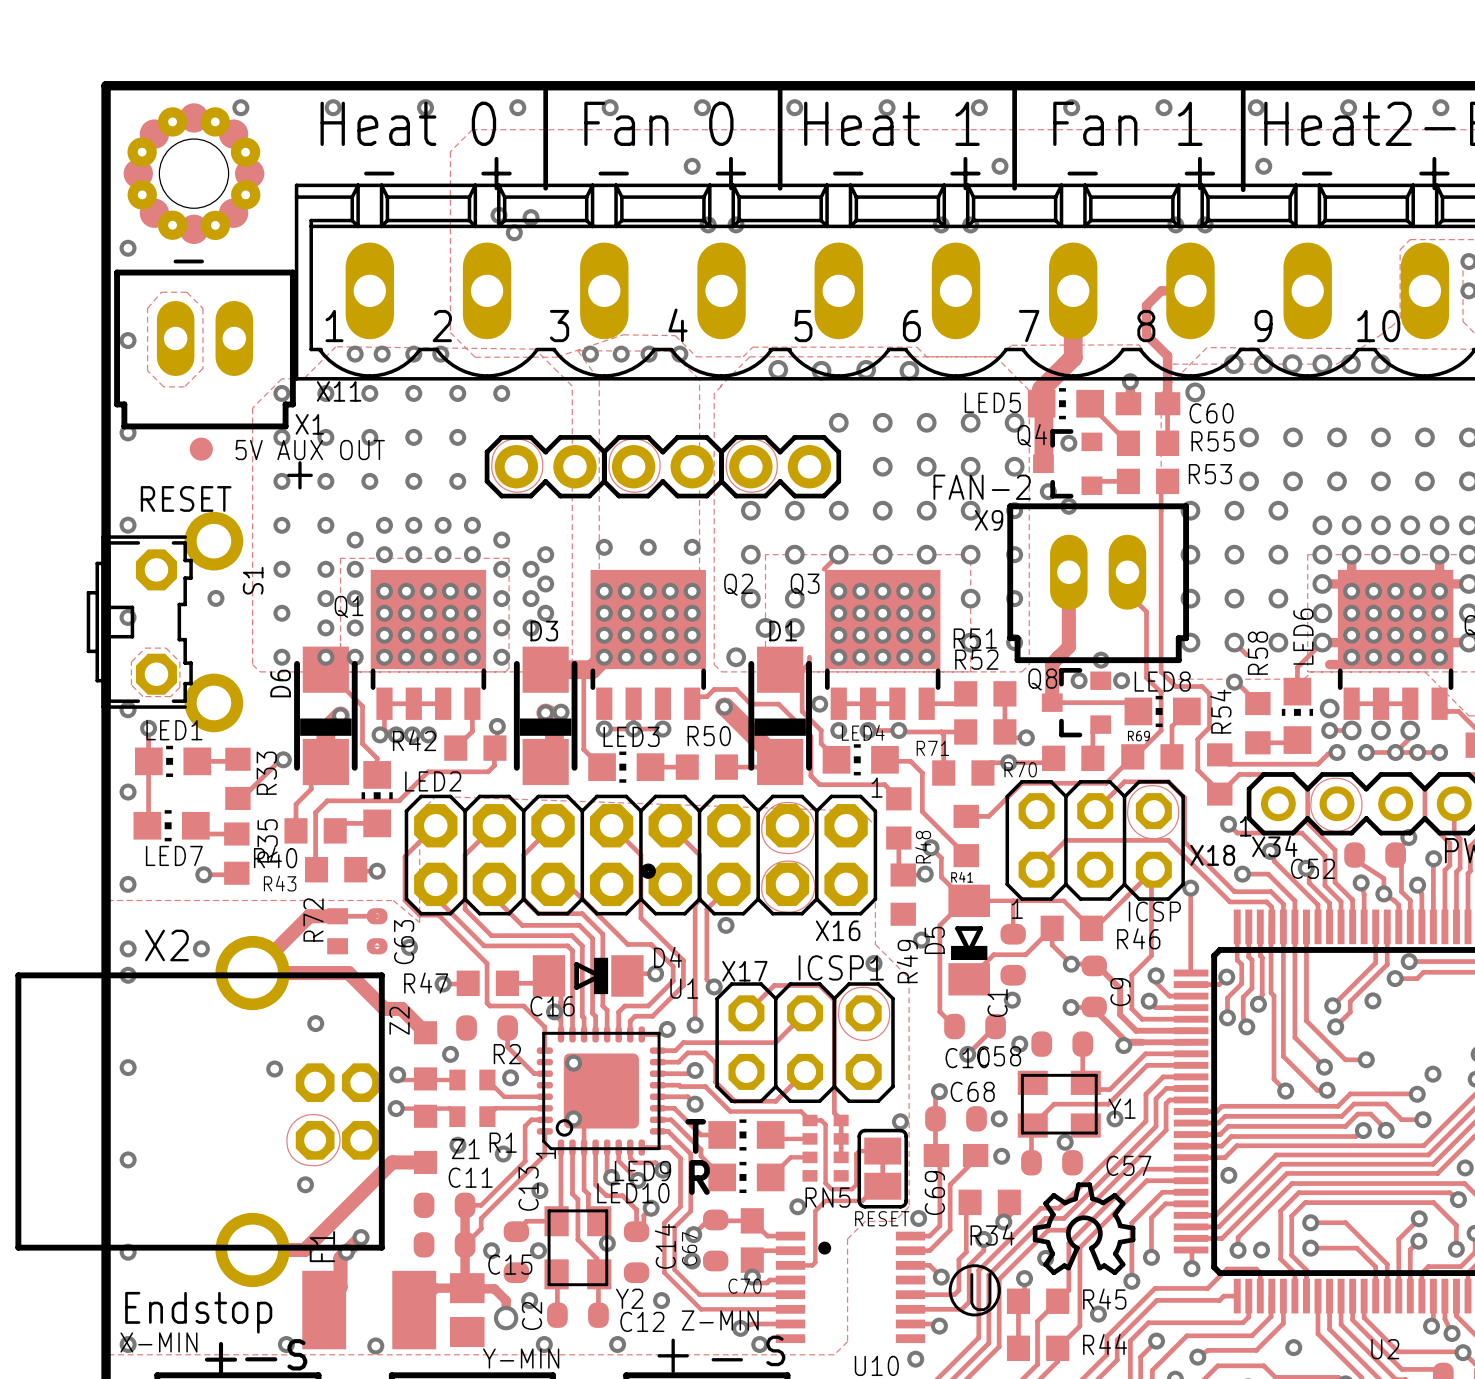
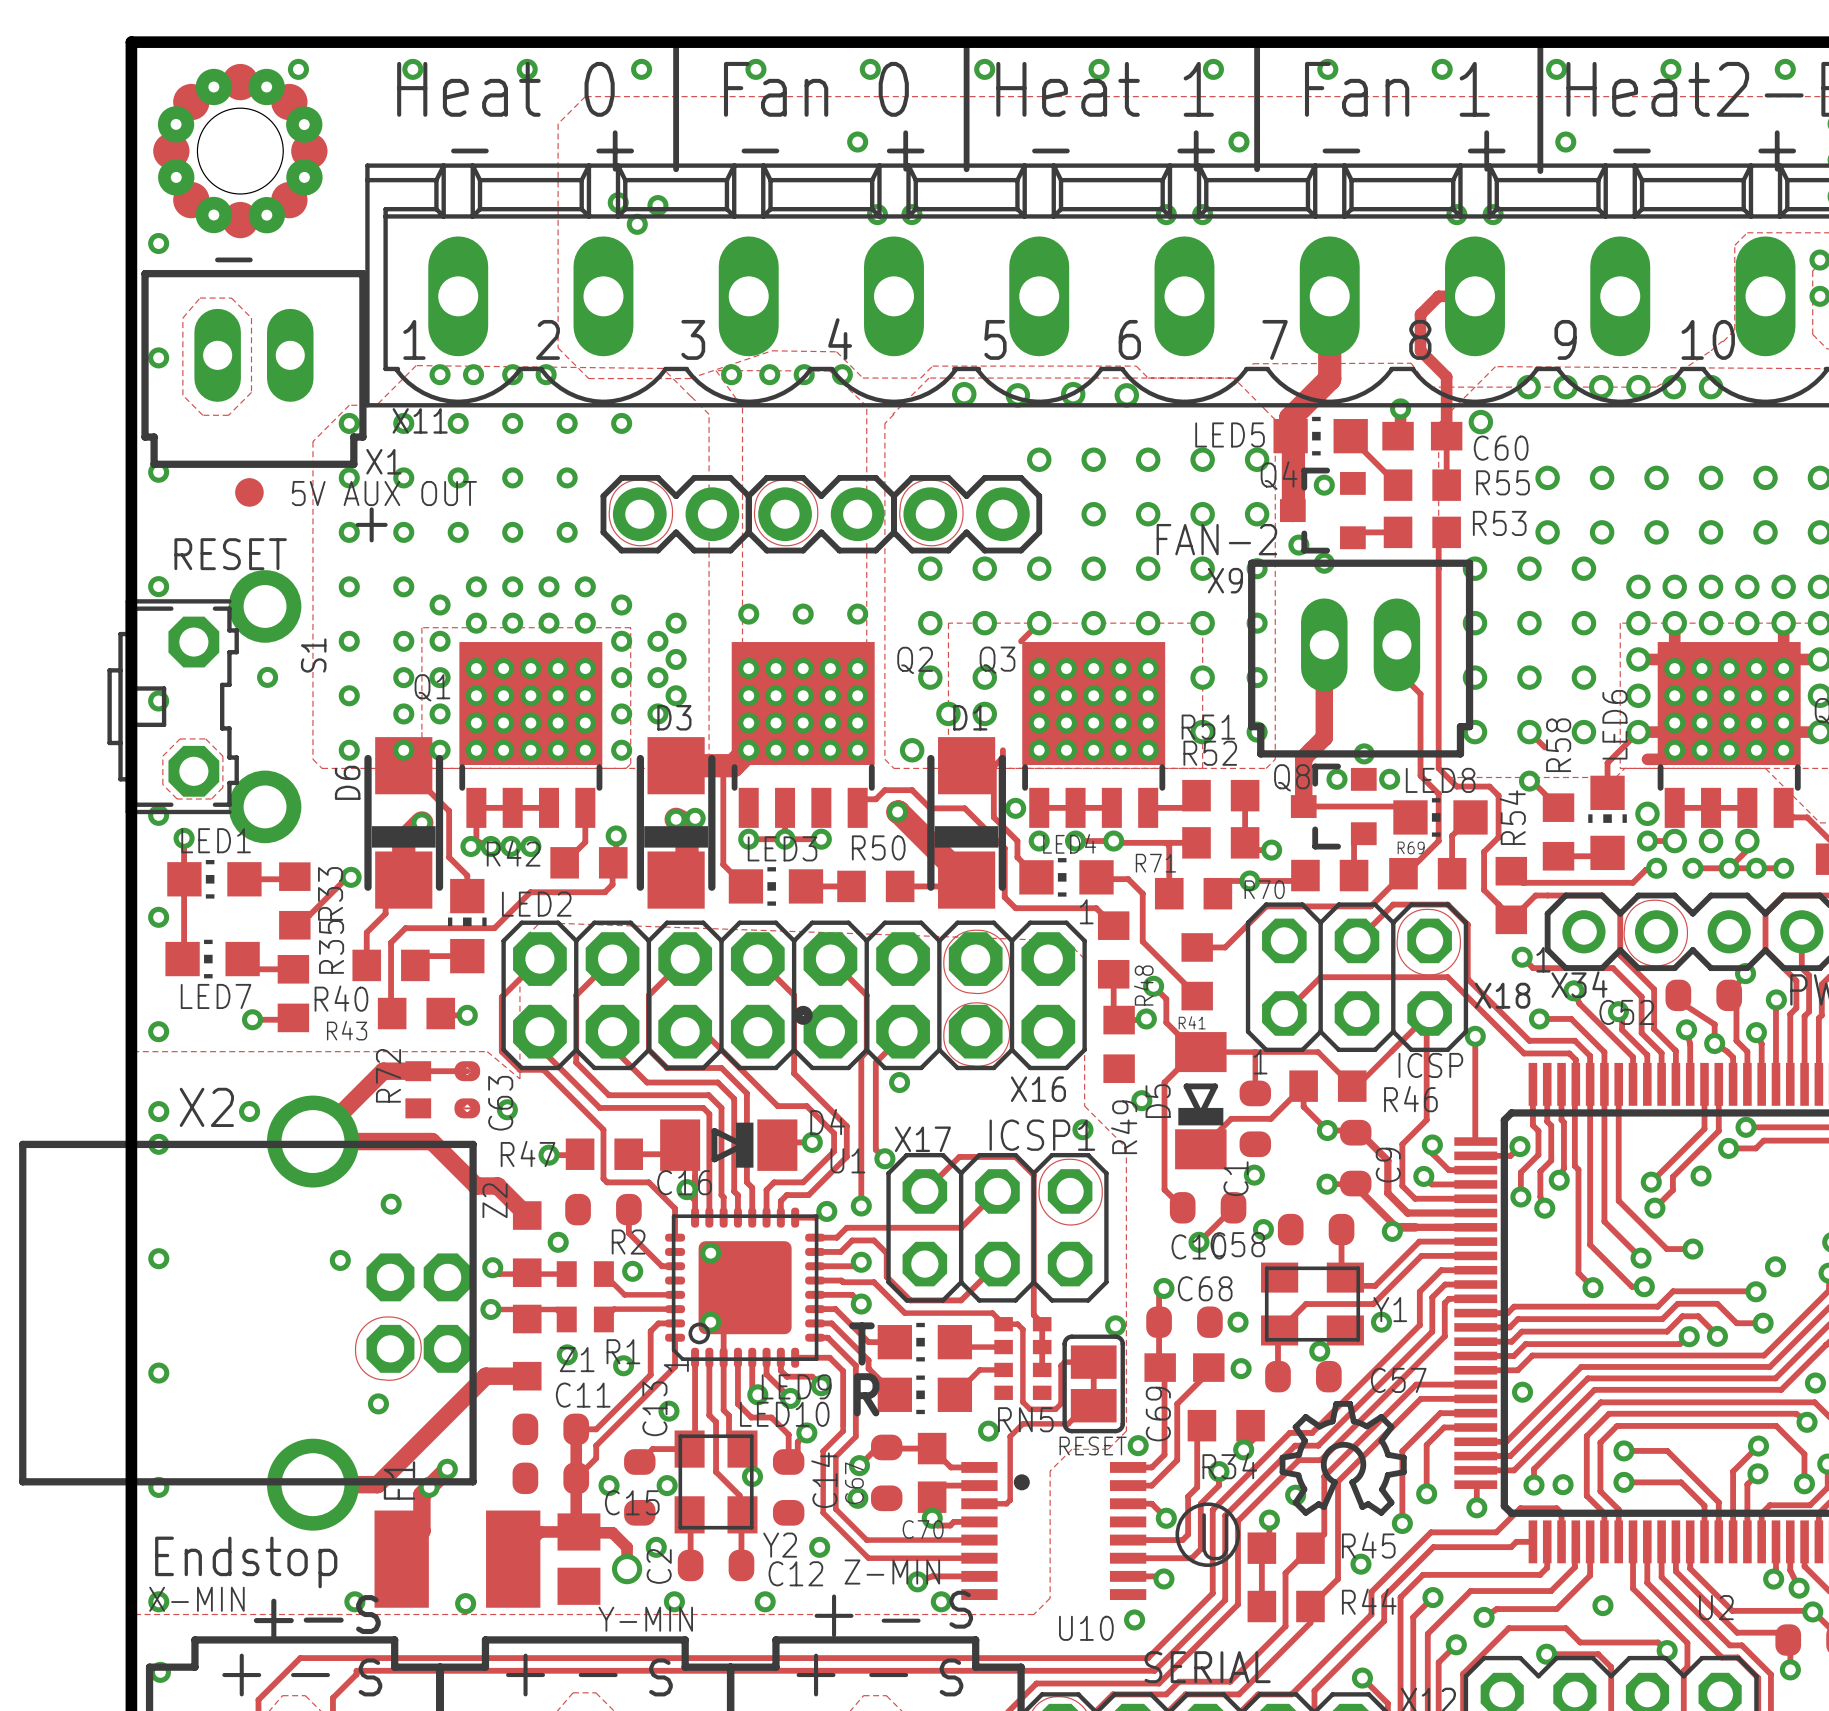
R35 name position: R35 (267, 840) -> R35 (331, 946)

